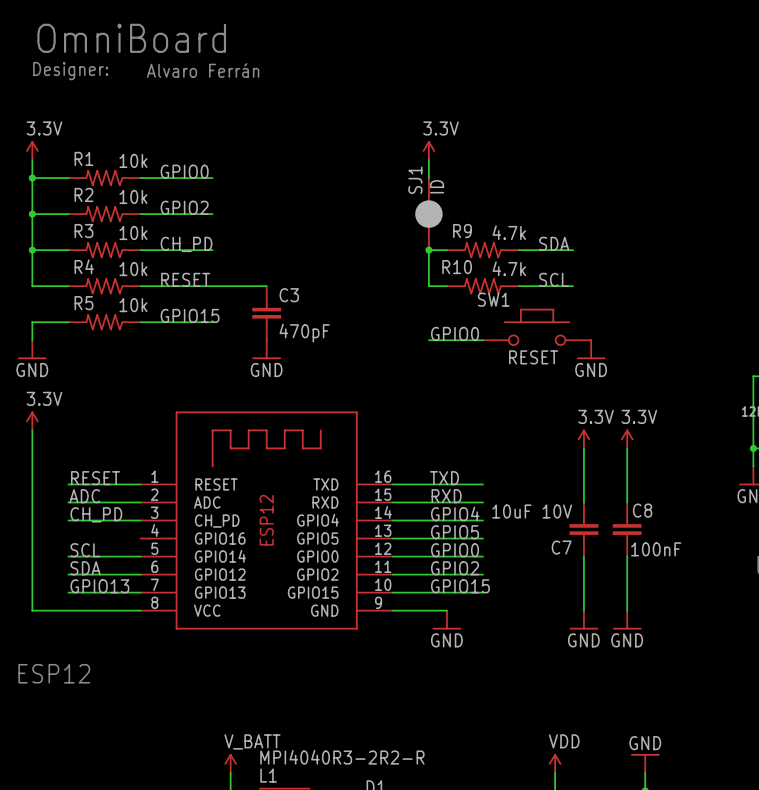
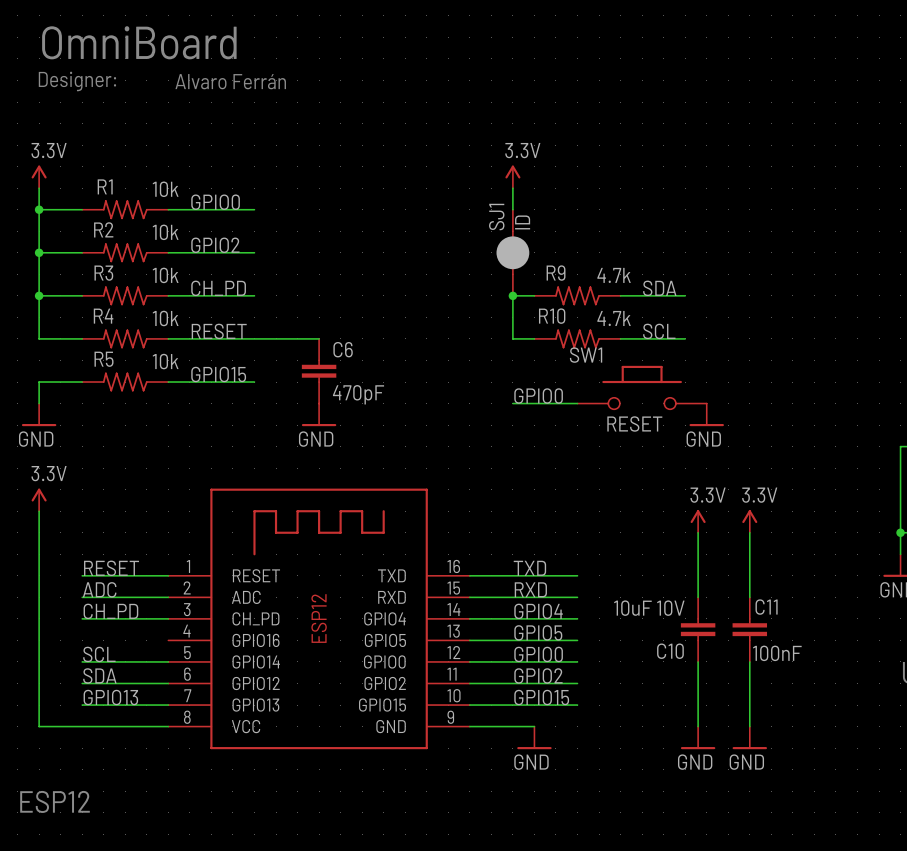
C3 name: C3 (289, 295) -> C6 (343, 349)
C8 name: C8 (642, 510) -> C11 (766, 607)
C7 name: C7 (561, 547) -> C10 (670, 651)

